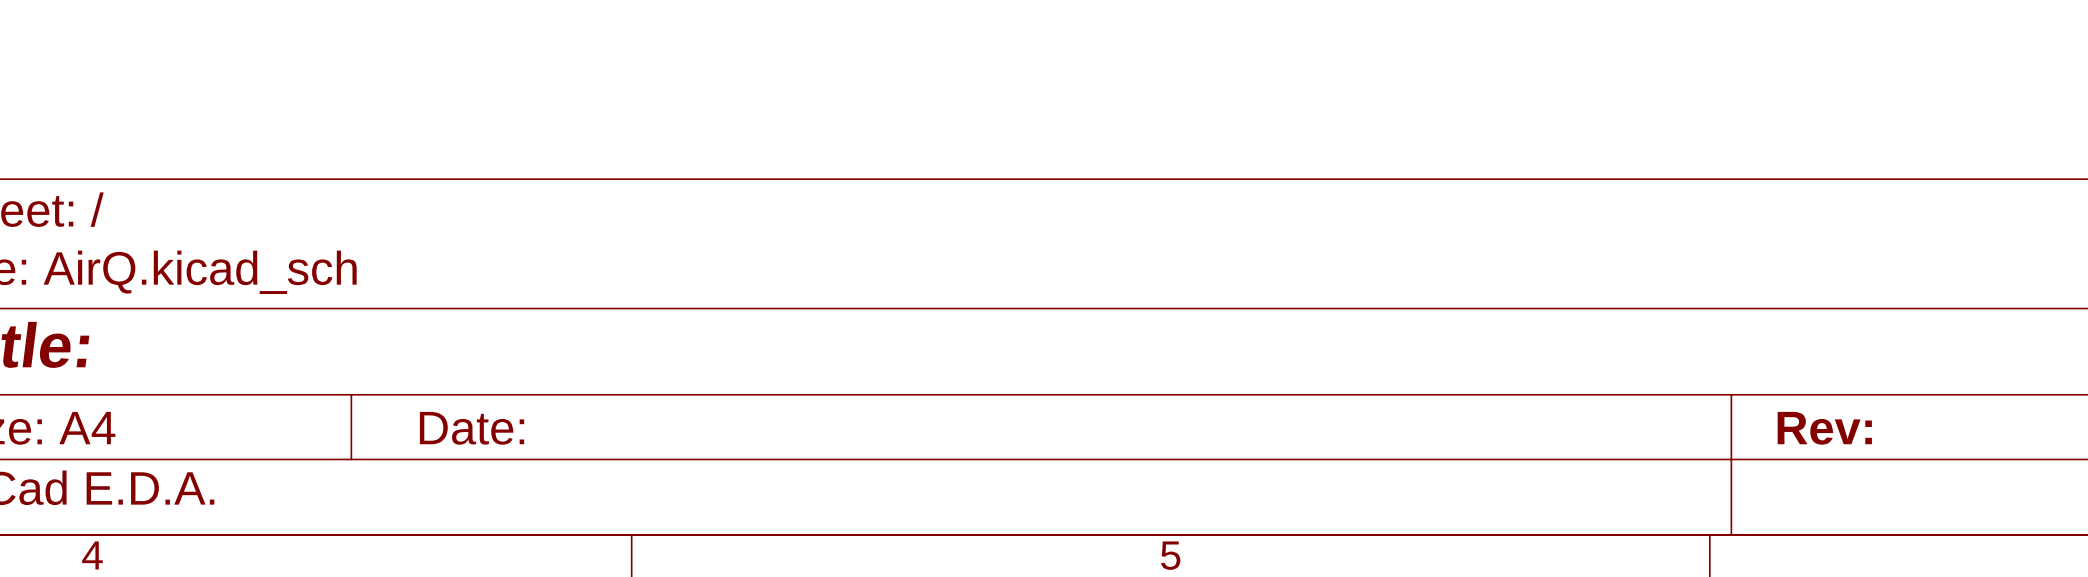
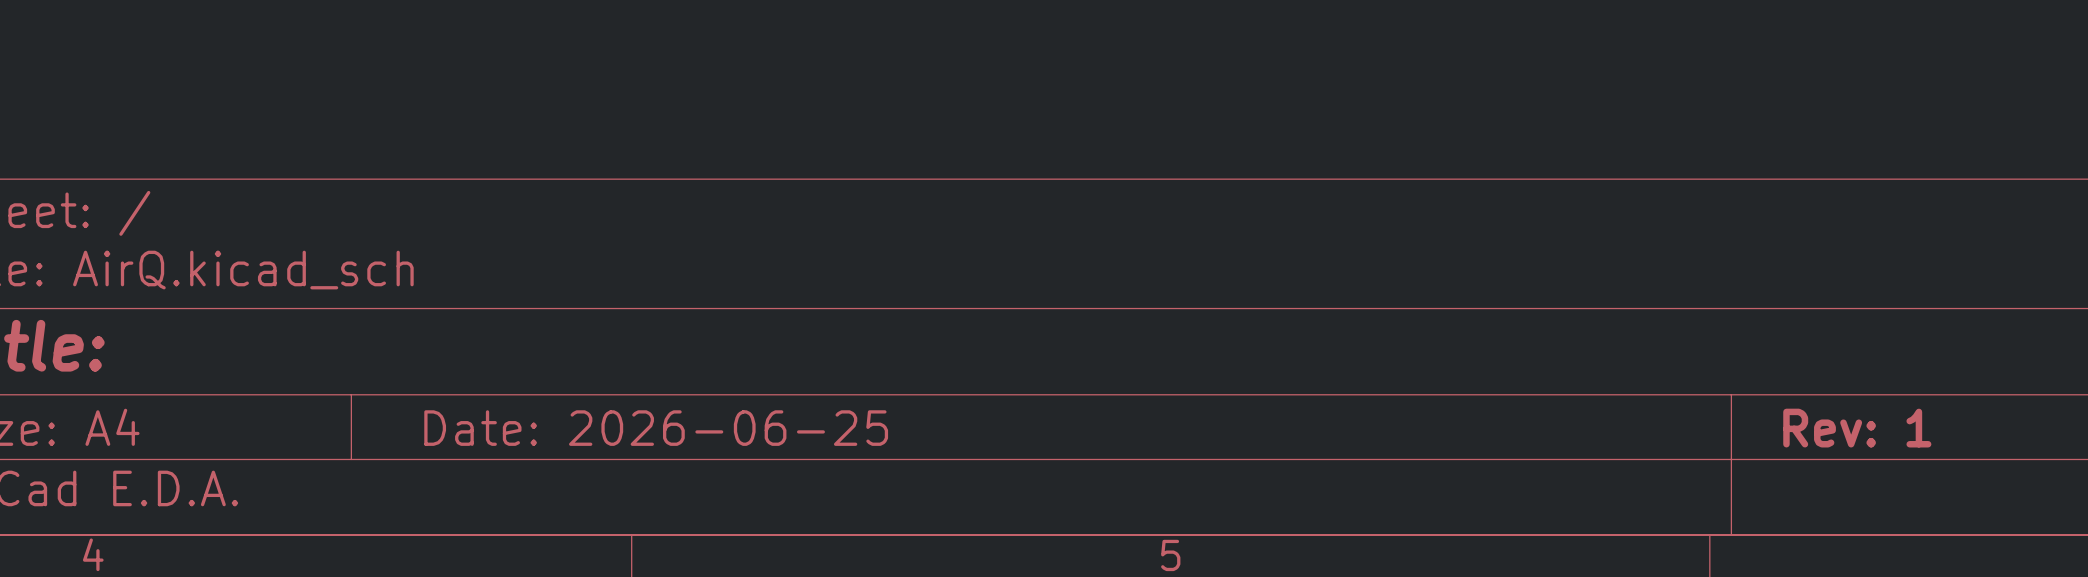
title block: Date: (472, 428) -> Date: 2026-06-25 (656, 428)
title block: Rev: (1824, 428) -> Rev: 1 (1857, 428)

